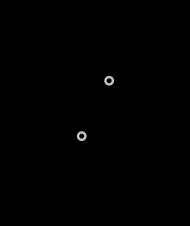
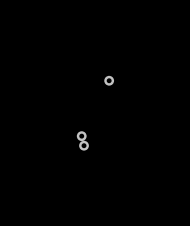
via: none -> (84, 145)

